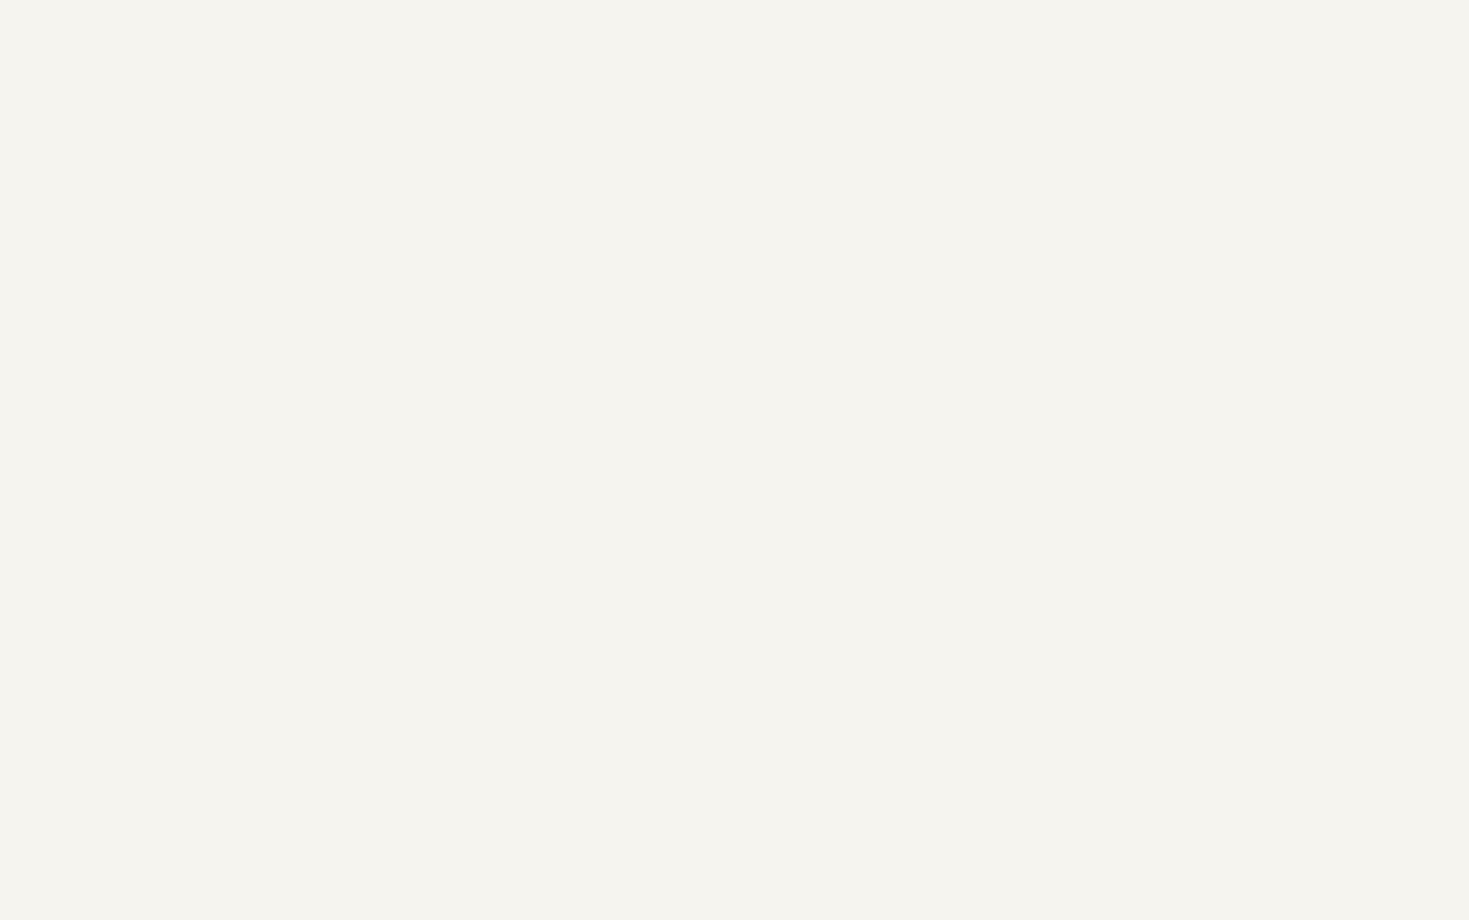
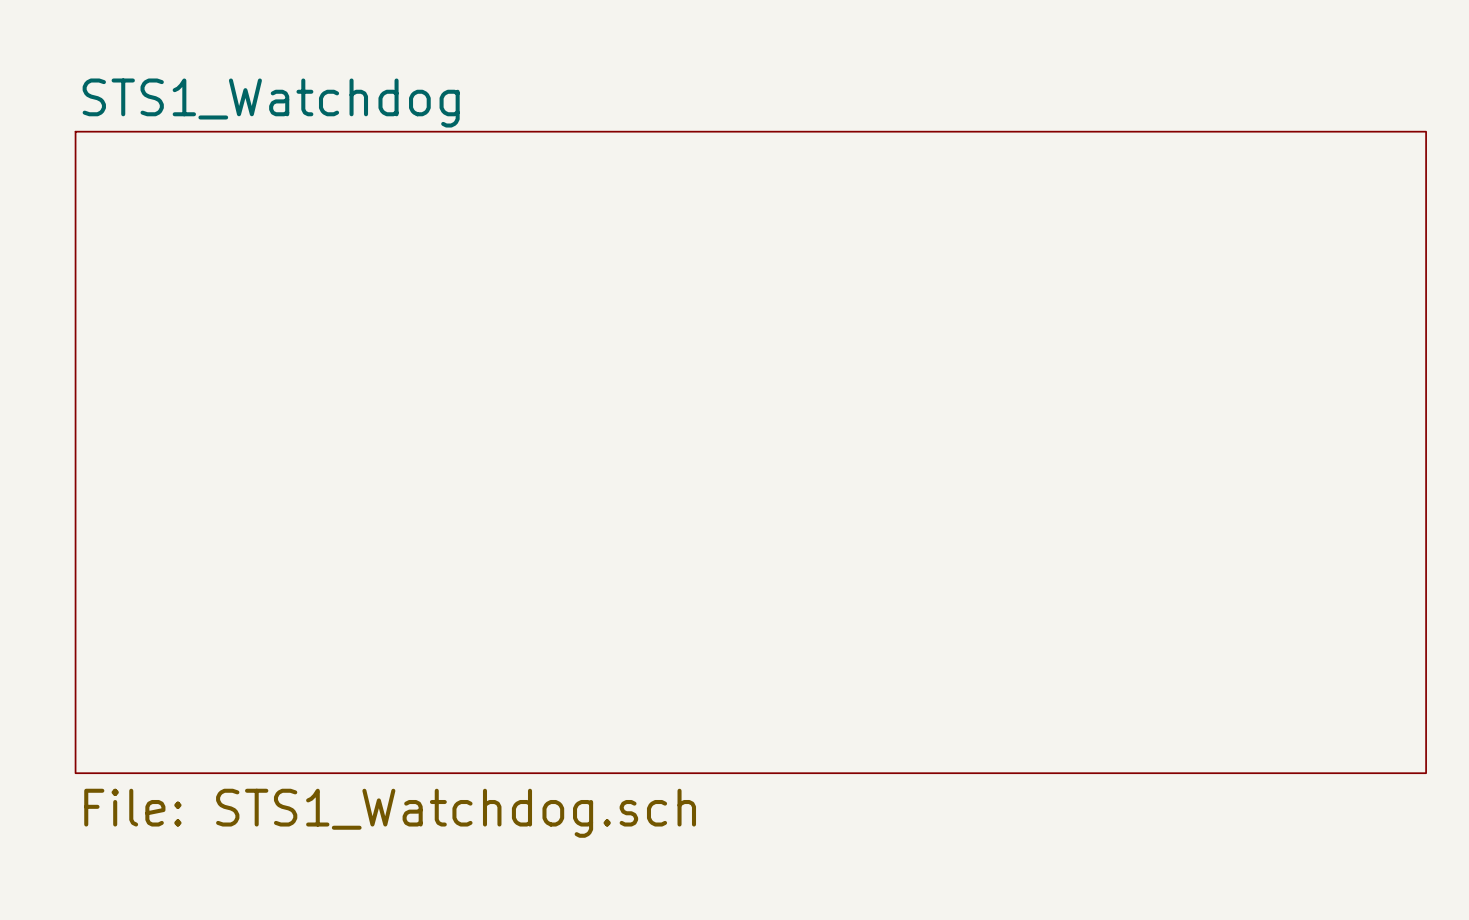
sheet STS1_Watchdog: none -> File: STS1_Watchdog.sch (750, 452)

